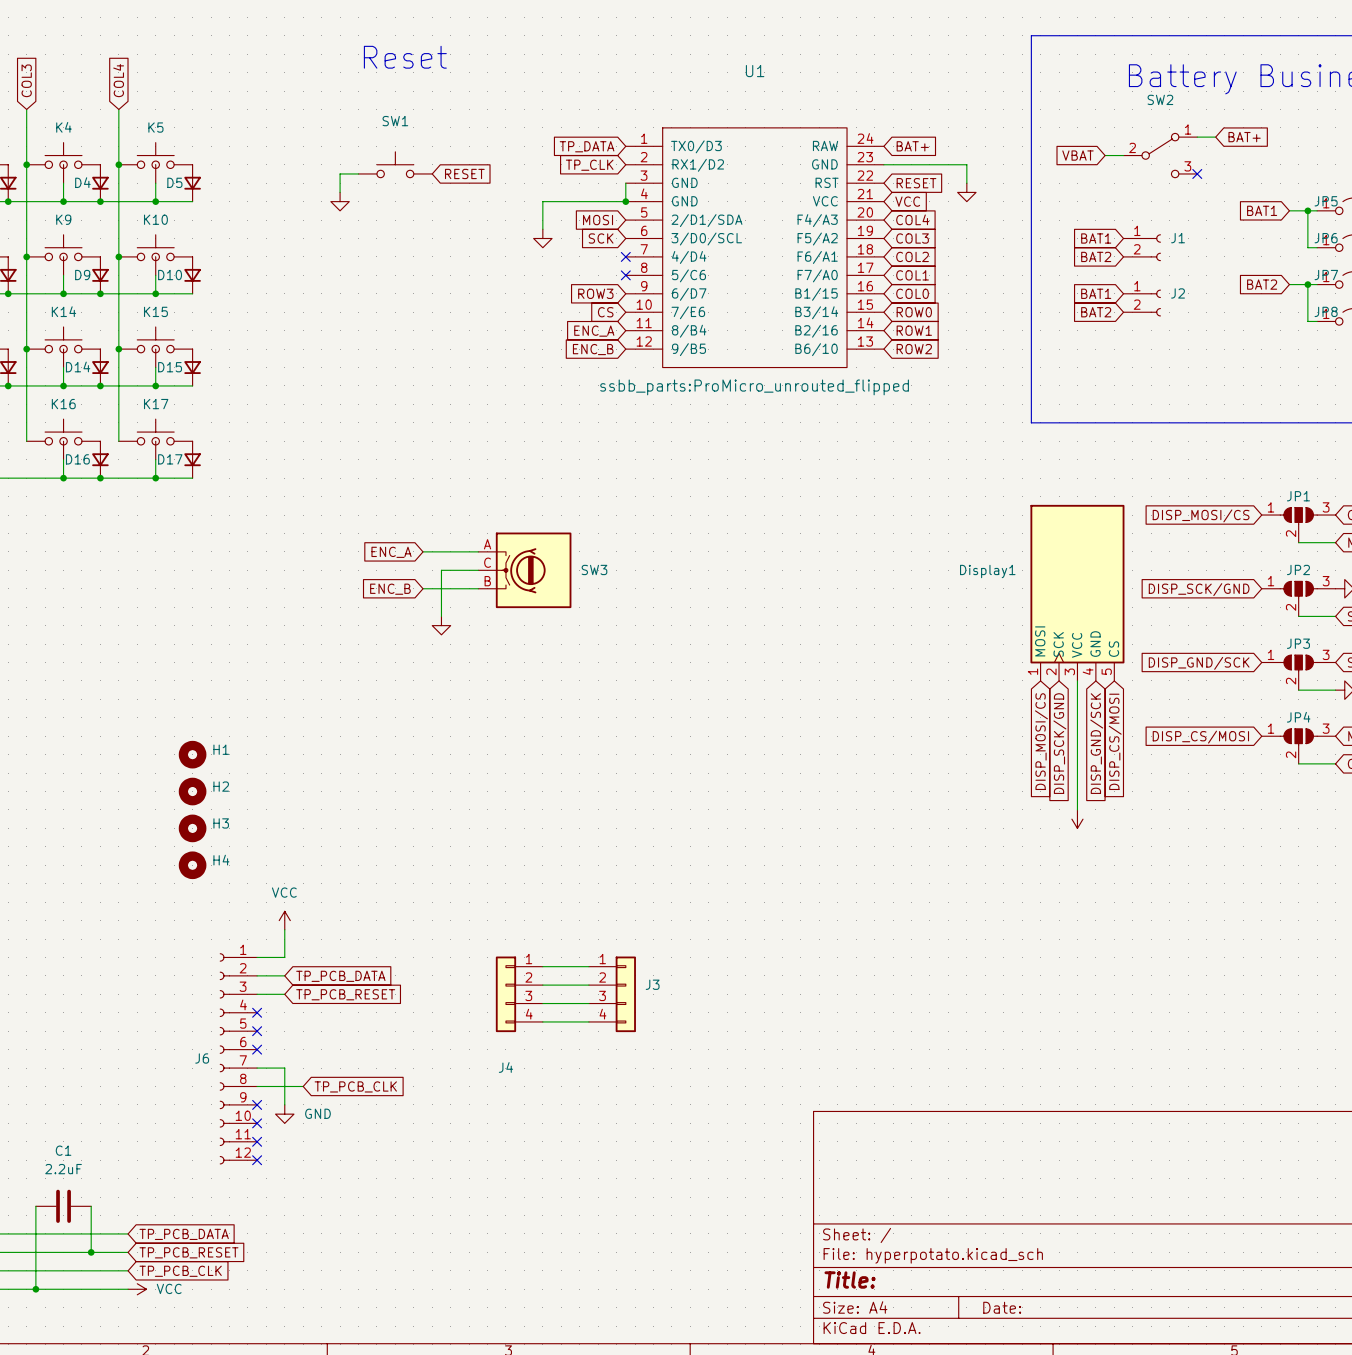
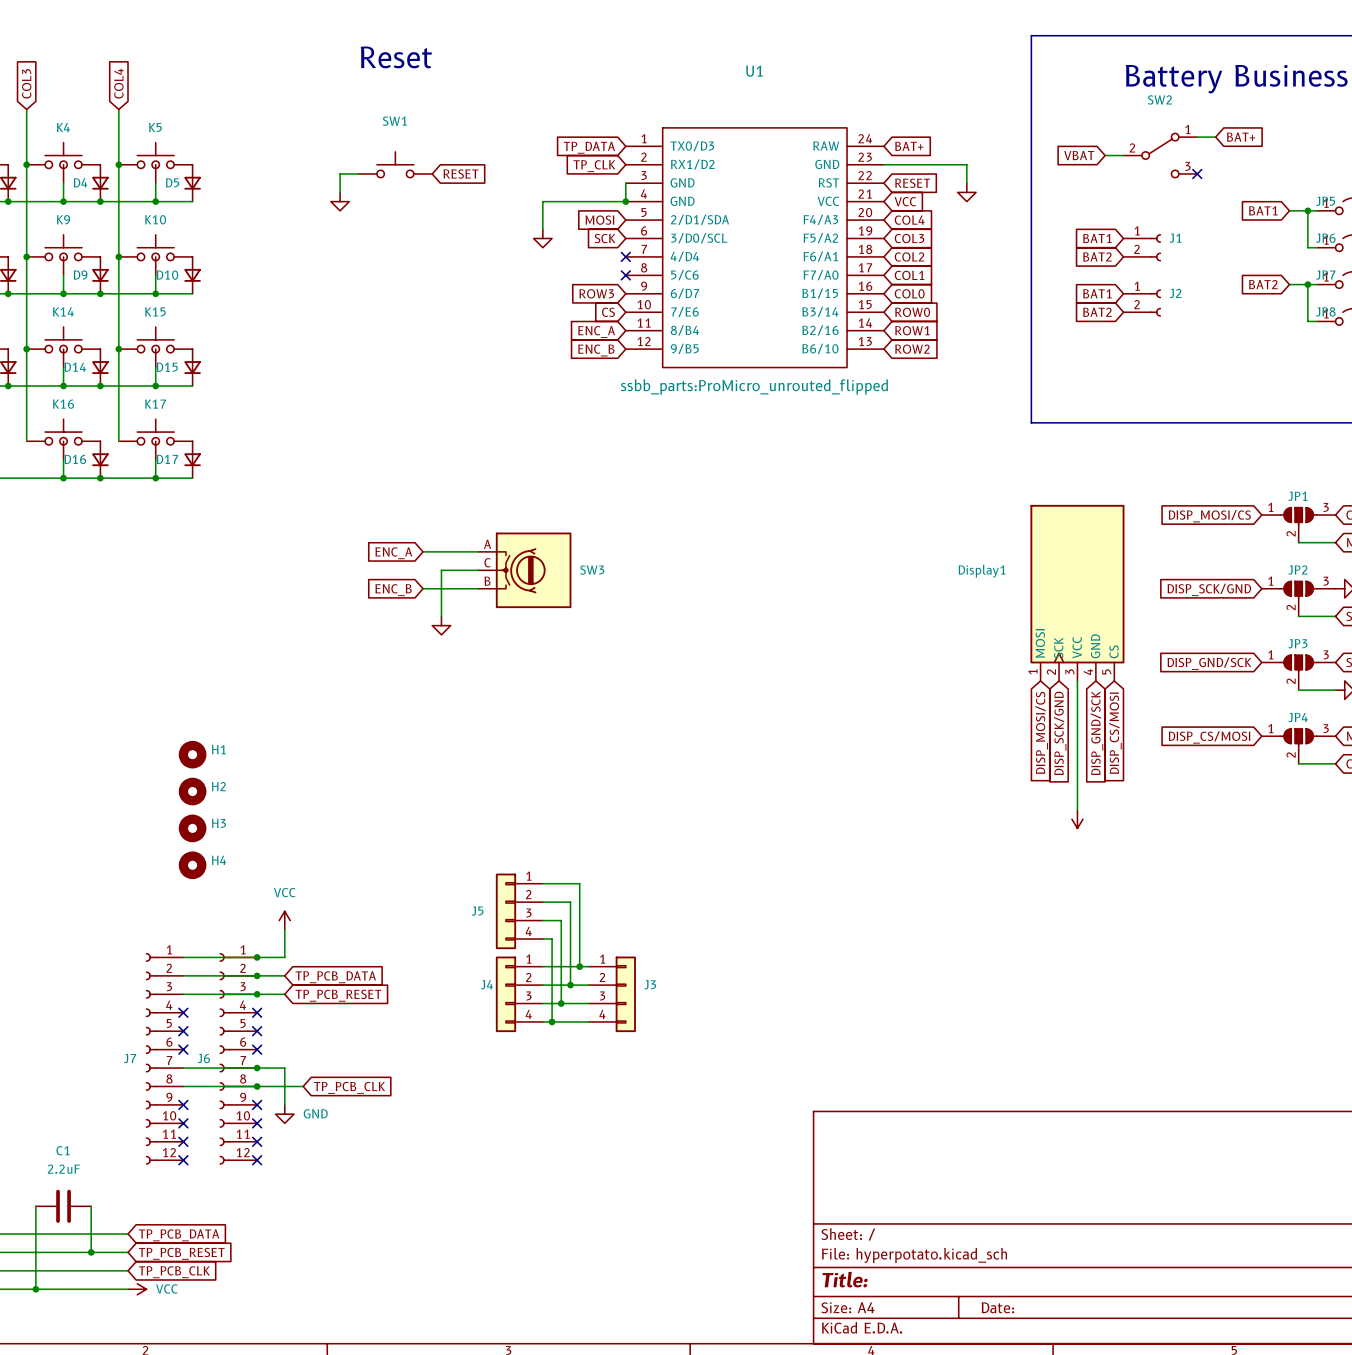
wire: none -> (542, 883) (579, 883) (579, 966)
wire: none -> (542, 902) (570, 902) (570, 985)
J5: none -> (519, 911)
wire: none -> (542, 920) (561, 920) (561, 1003)
wire: none -> (542, 939) (552, 939) (552, 1021)
wire: none -> (183, 957) (257, 957)
junction: none -> (257, 957)
junction: none -> (579, 966)
wire: none -> (183, 975) (257, 975)
junction: none -> (257, 975)
junction: none -> (570, 985)
wire: none -> (183, 994) (257, 994)
junction: none -> (257, 994)
junction: none -> (561, 1003)
no-connect mark: none -> (183, 1012)
junction: none -> (552, 1021)
no-connect mark: none -> (183, 1031)
no-connect mark: none -> (183, 1049)
J7: none -> (164, 1058)
J4 name position: J4 (505, 1067) -> J4 (486, 984)
wire: none -> (183, 1068) (257, 1068)
junction: none -> (257, 1068)
wire: none -> (183, 1086) (257, 1086)
junction: none -> (257, 1086)
no-connect mark: none -> (183, 1104)
no-connect mark: none -> (183, 1123)
no-connect mark: none -> (183, 1141)
no-connect mark: none -> (183, 1160)

